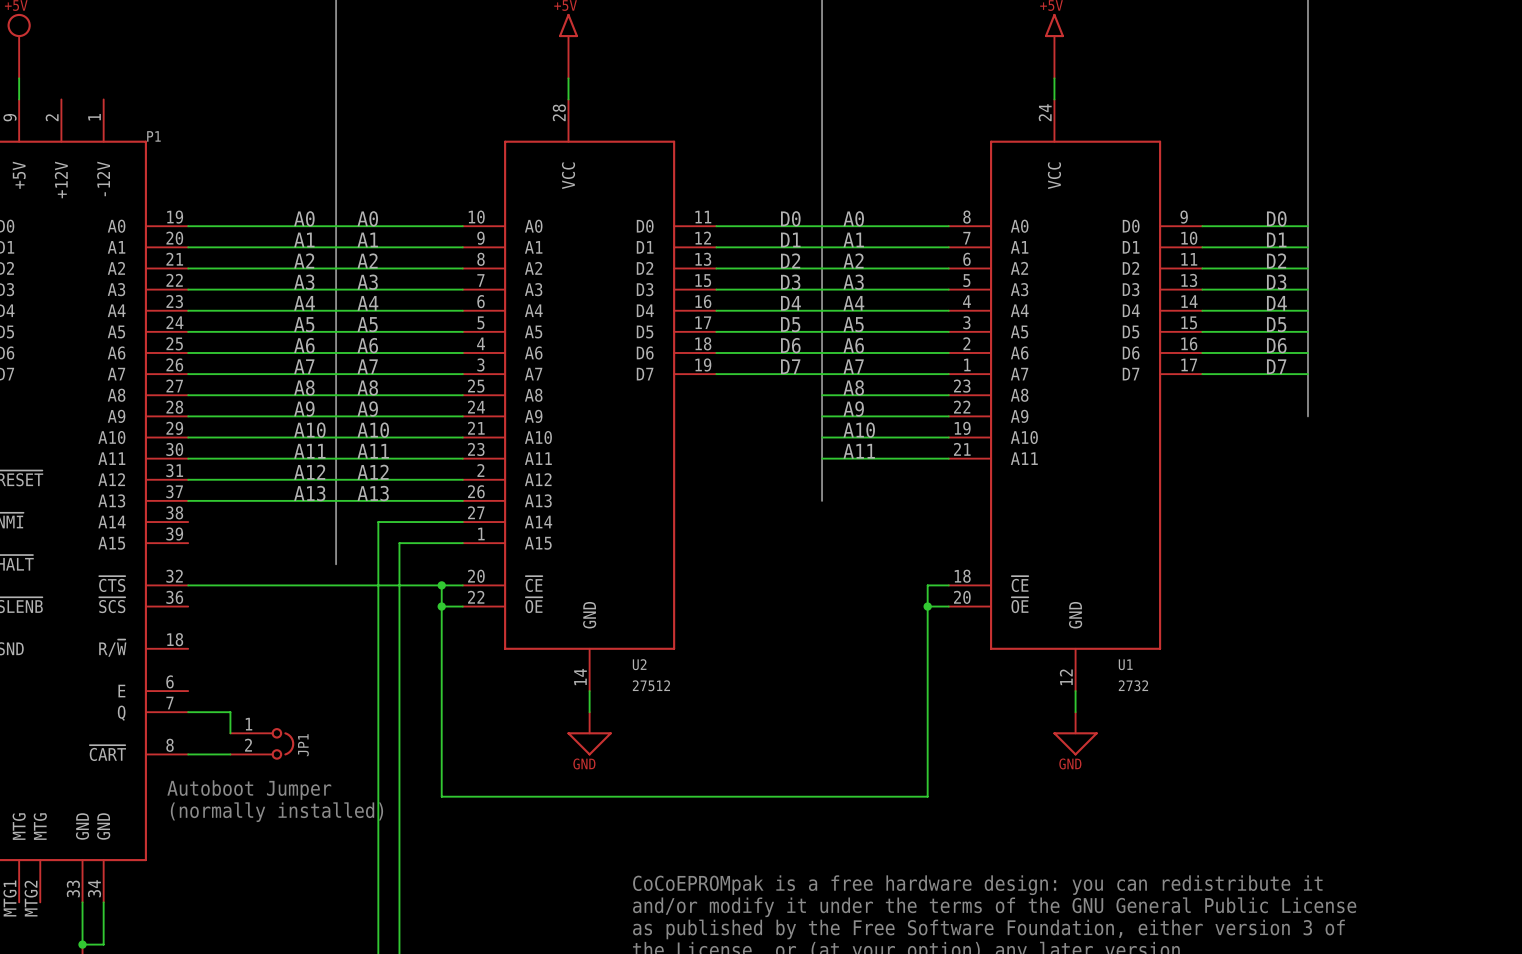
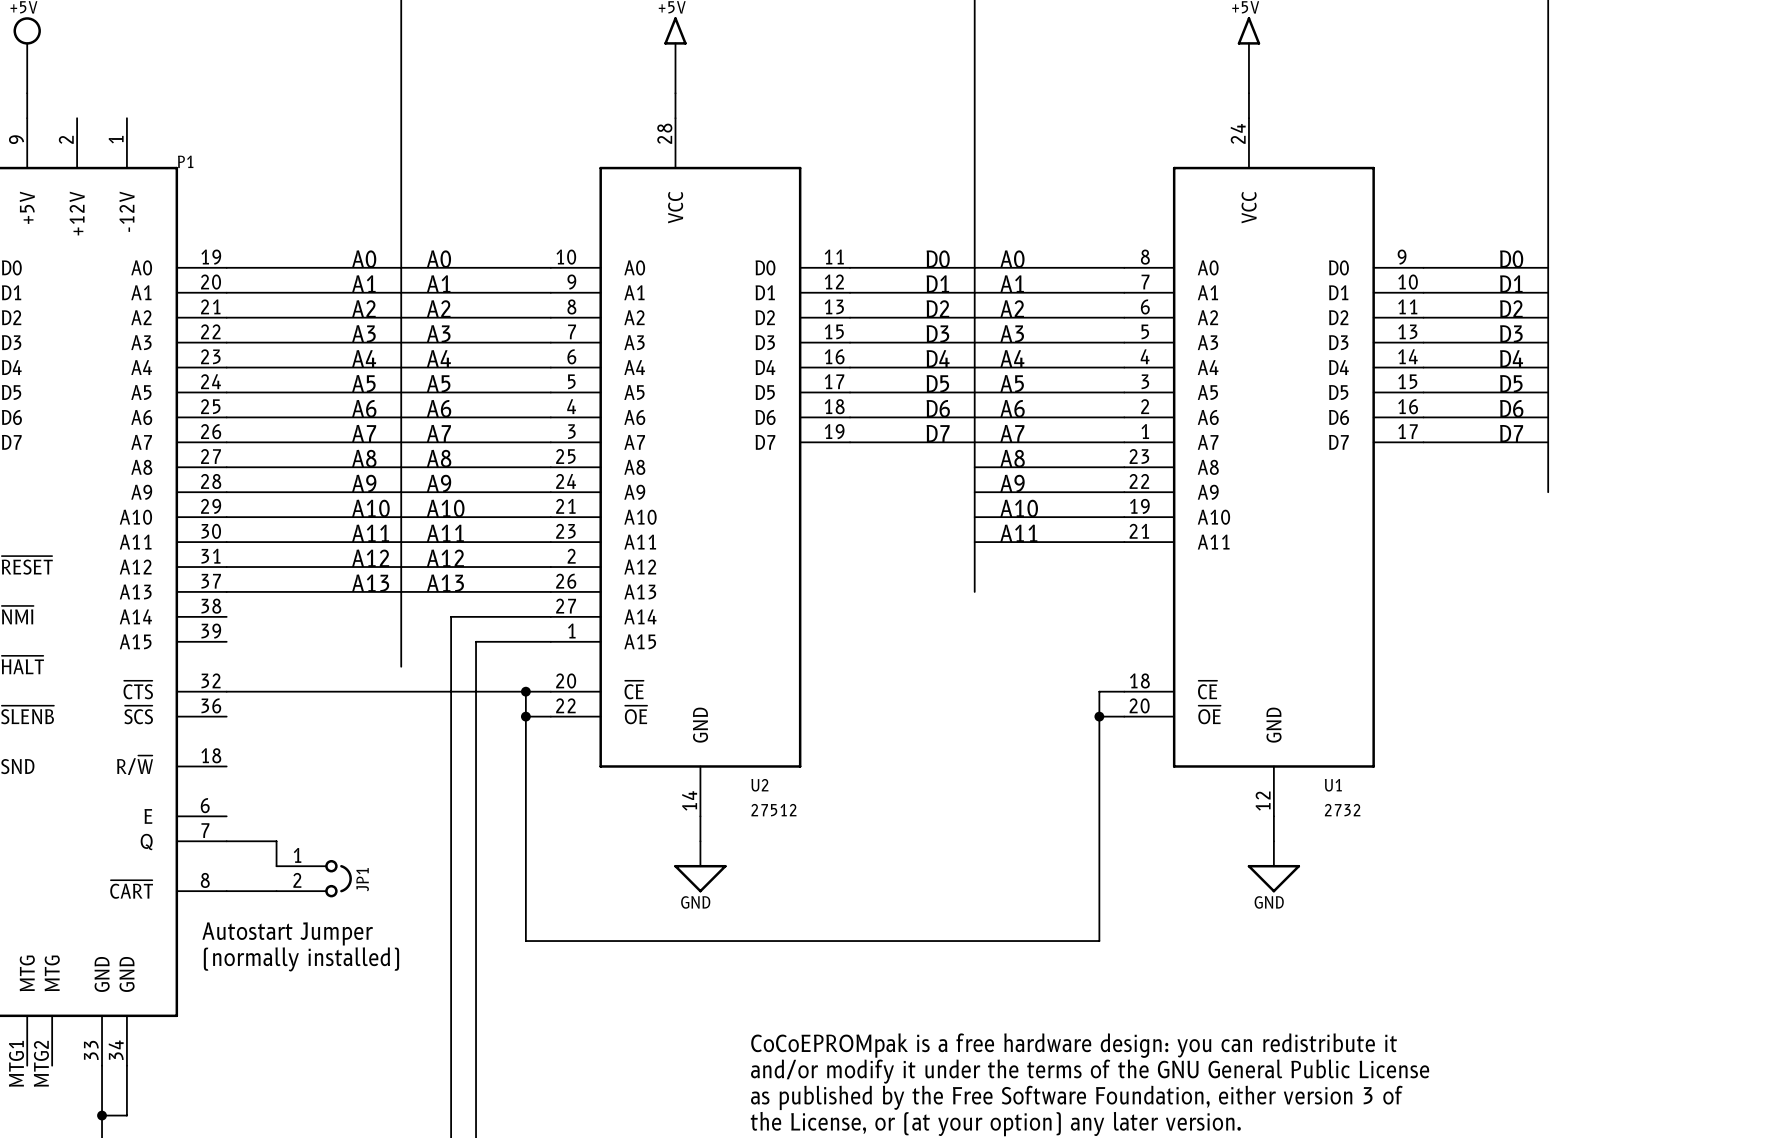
text: Autoboot Jumper (249, 790) -> Autostart Jumper (287, 933)

